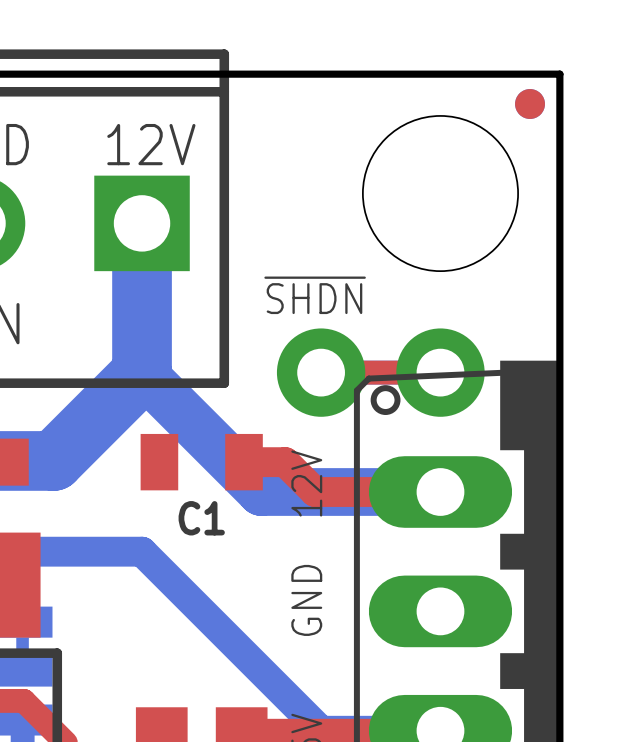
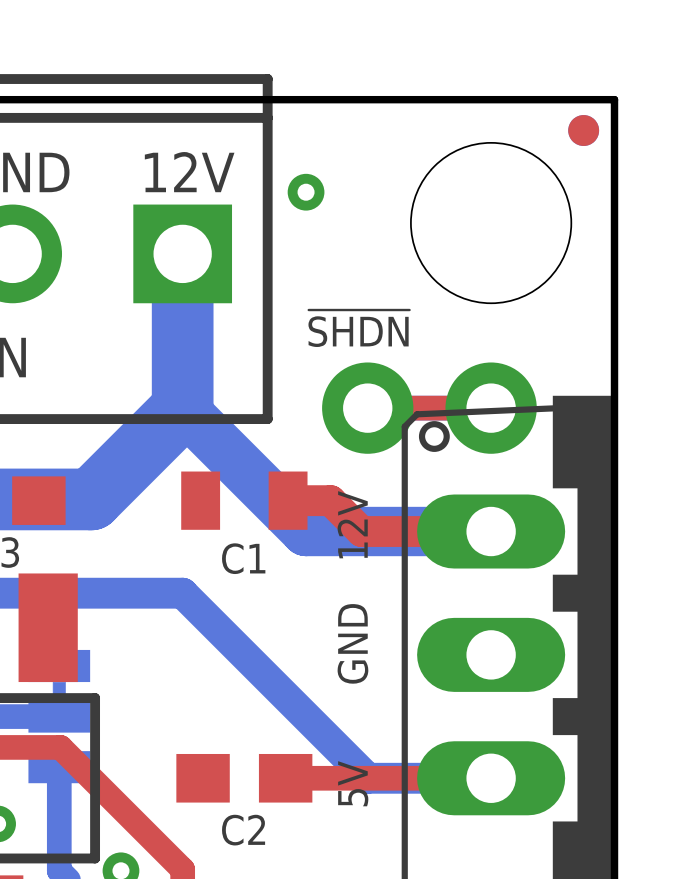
via: none -> (306, 192)

